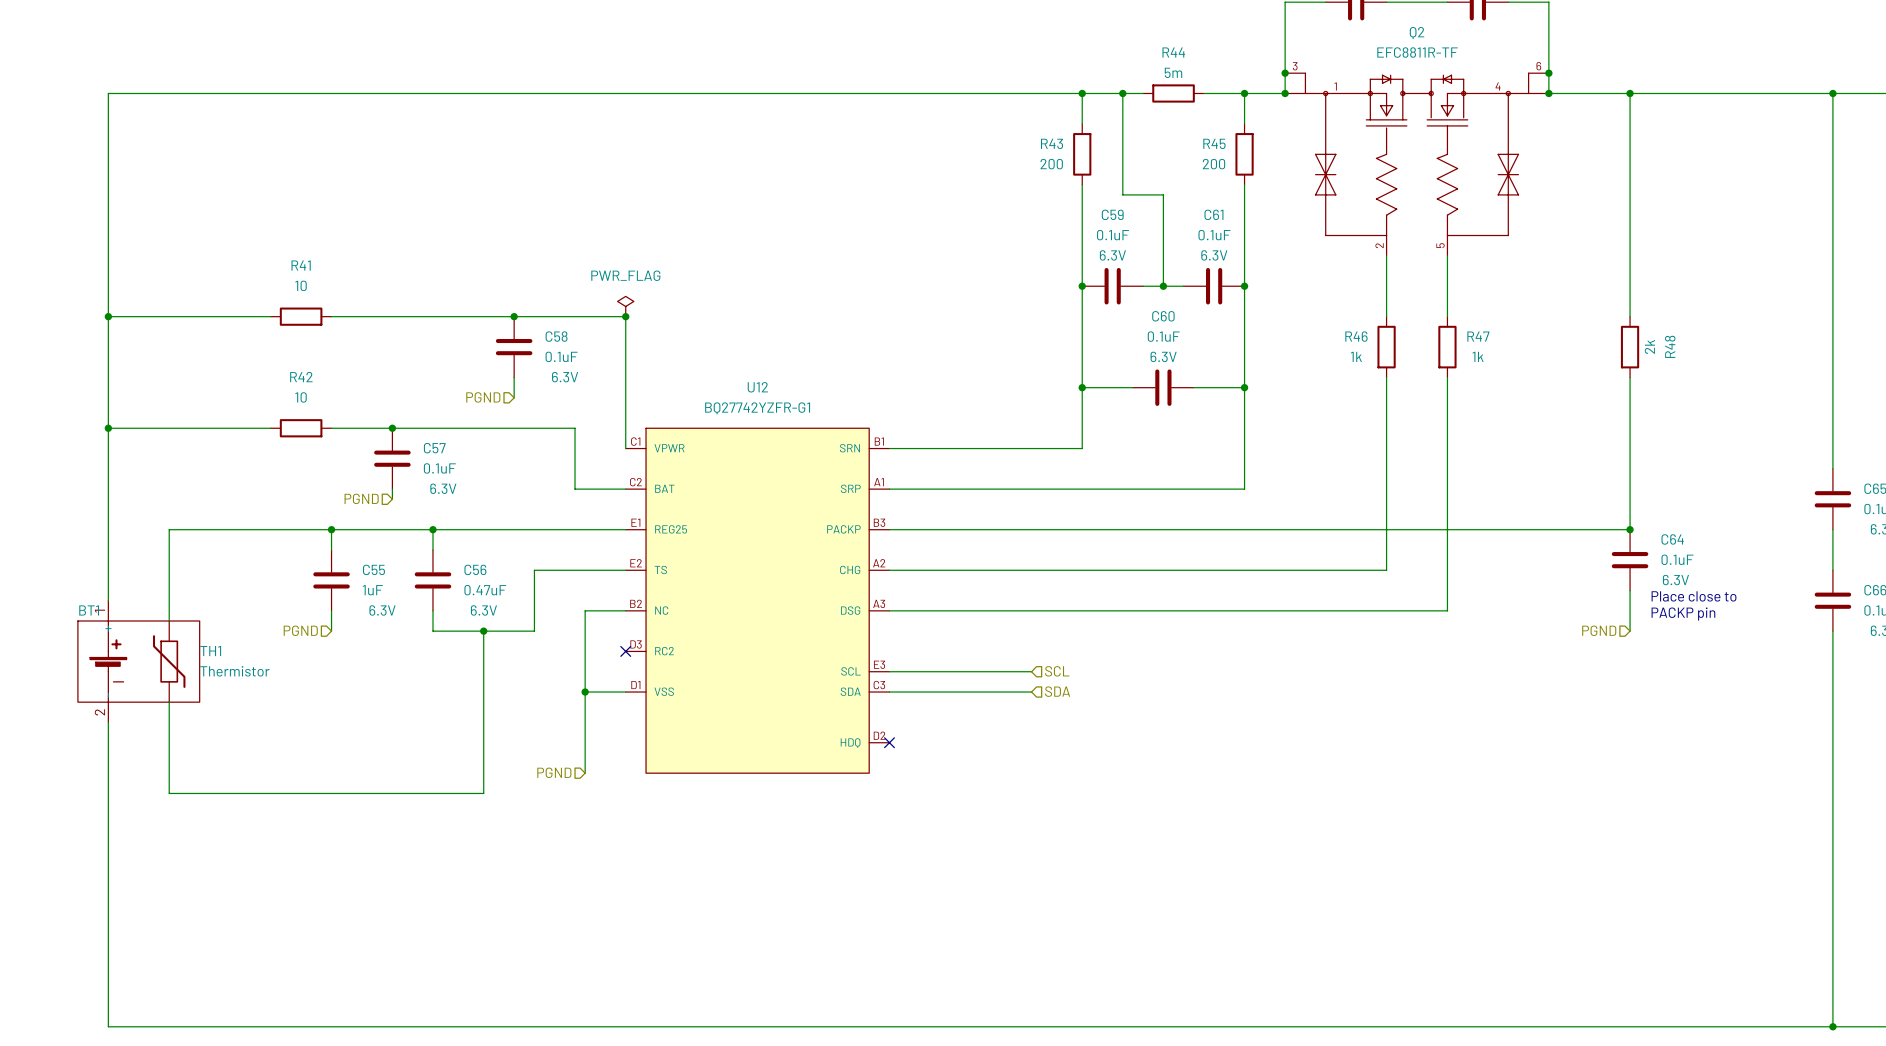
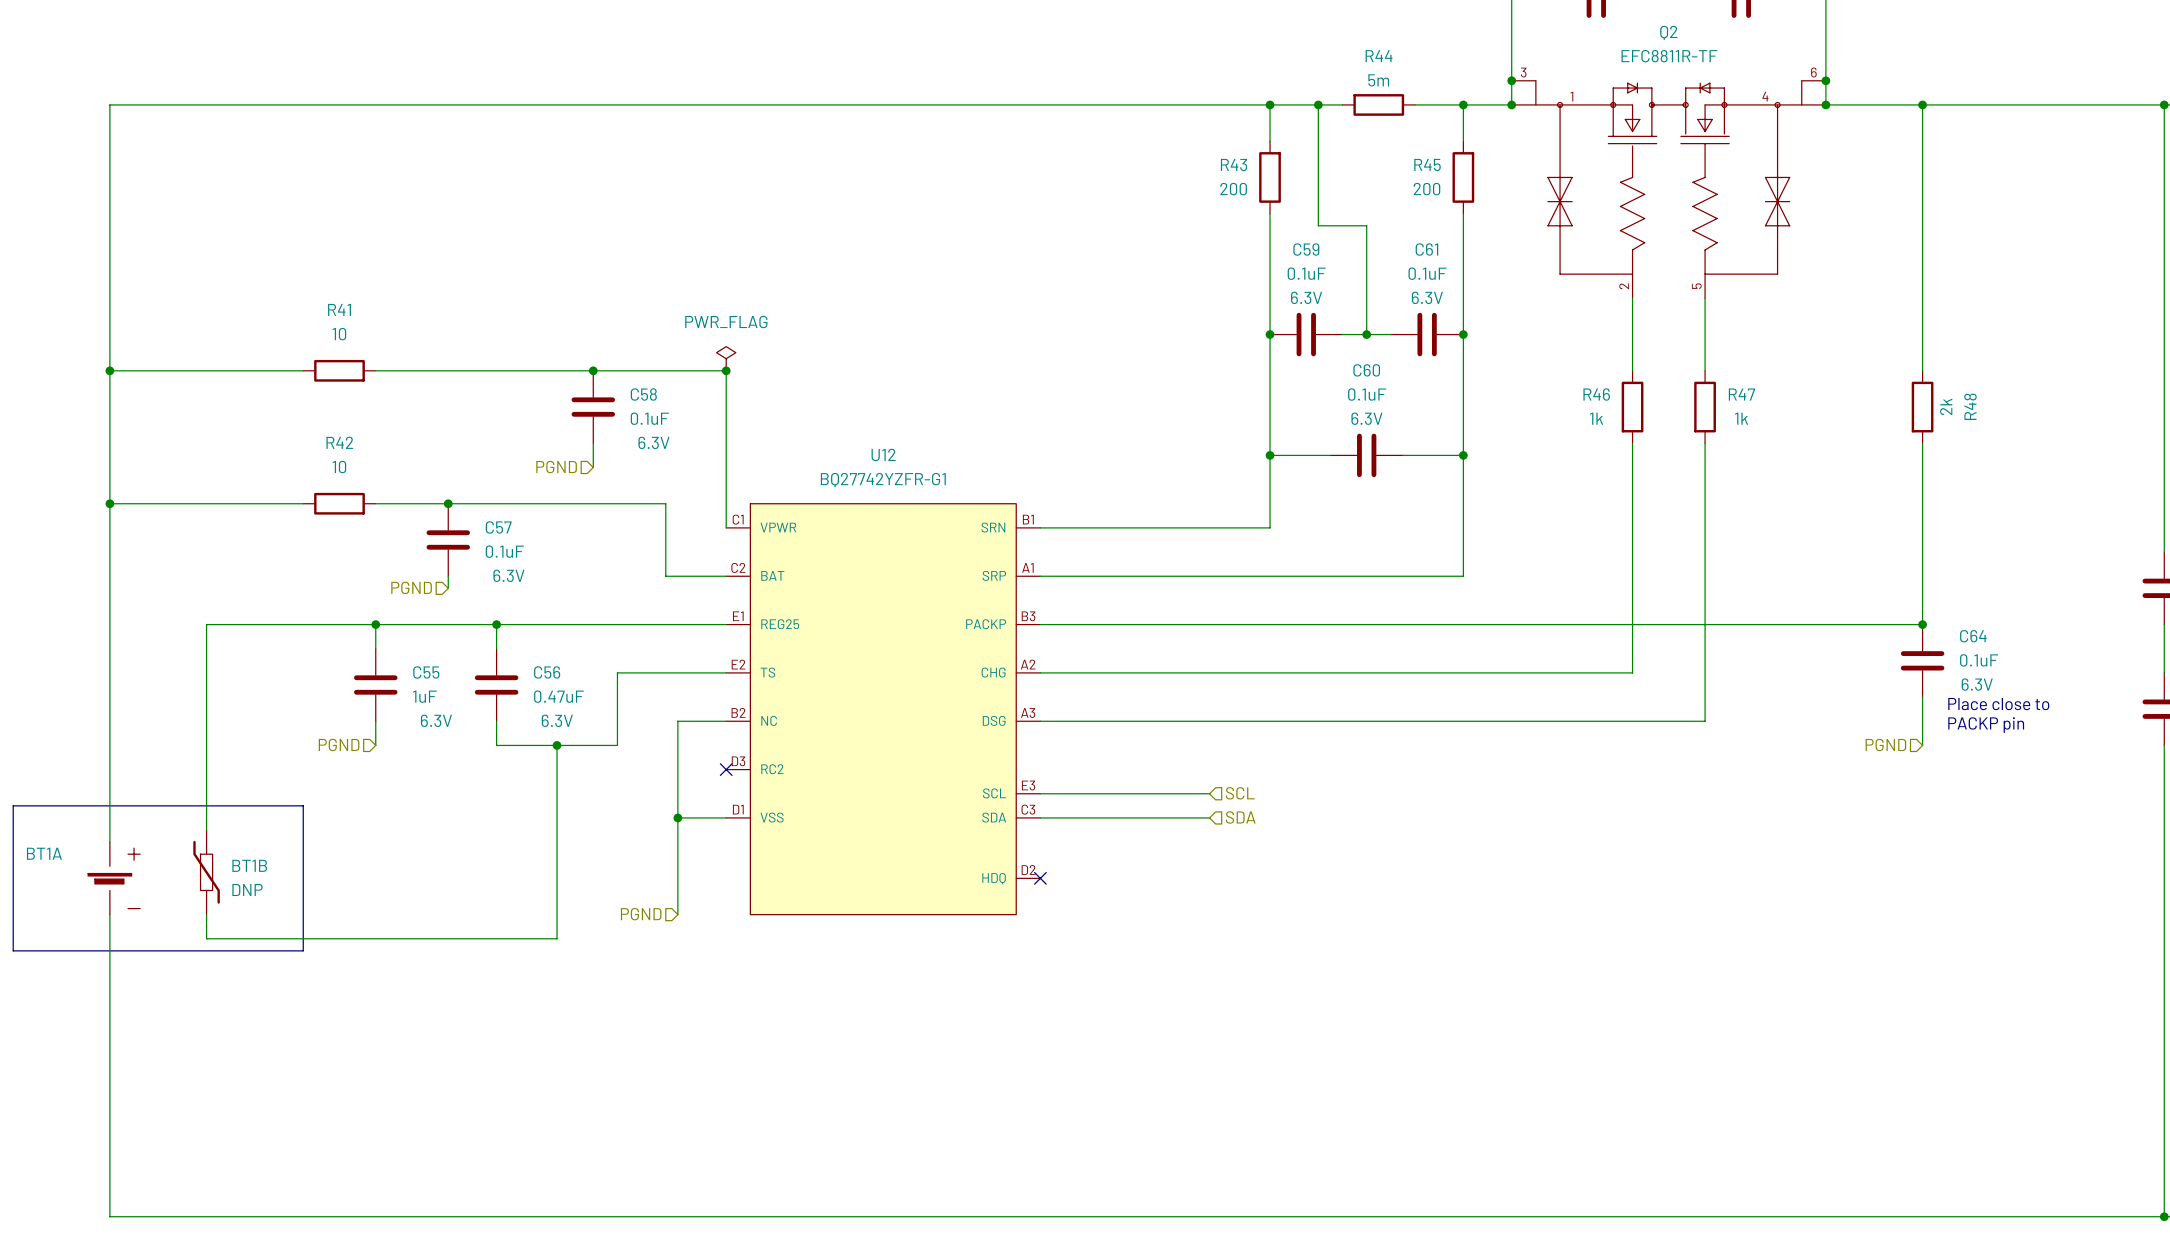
wire: (189, 529) (169, 529) (169, 621) -> (206, 624) (206, 830)
part: (108, 661) -> none
BT1: (138, 661) -> none
TH1: Thermistor (169, 661) -> none
line: none -> (13, 805) (13, 950) (303, 950) (303, 805) (13, 805)
wire: (169, 702) (169, 793) (189, 793) -> (206, 914) (206, 938)
BT1B: none -> DNP (206, 872)
BT1A: none -> (114, 878)

